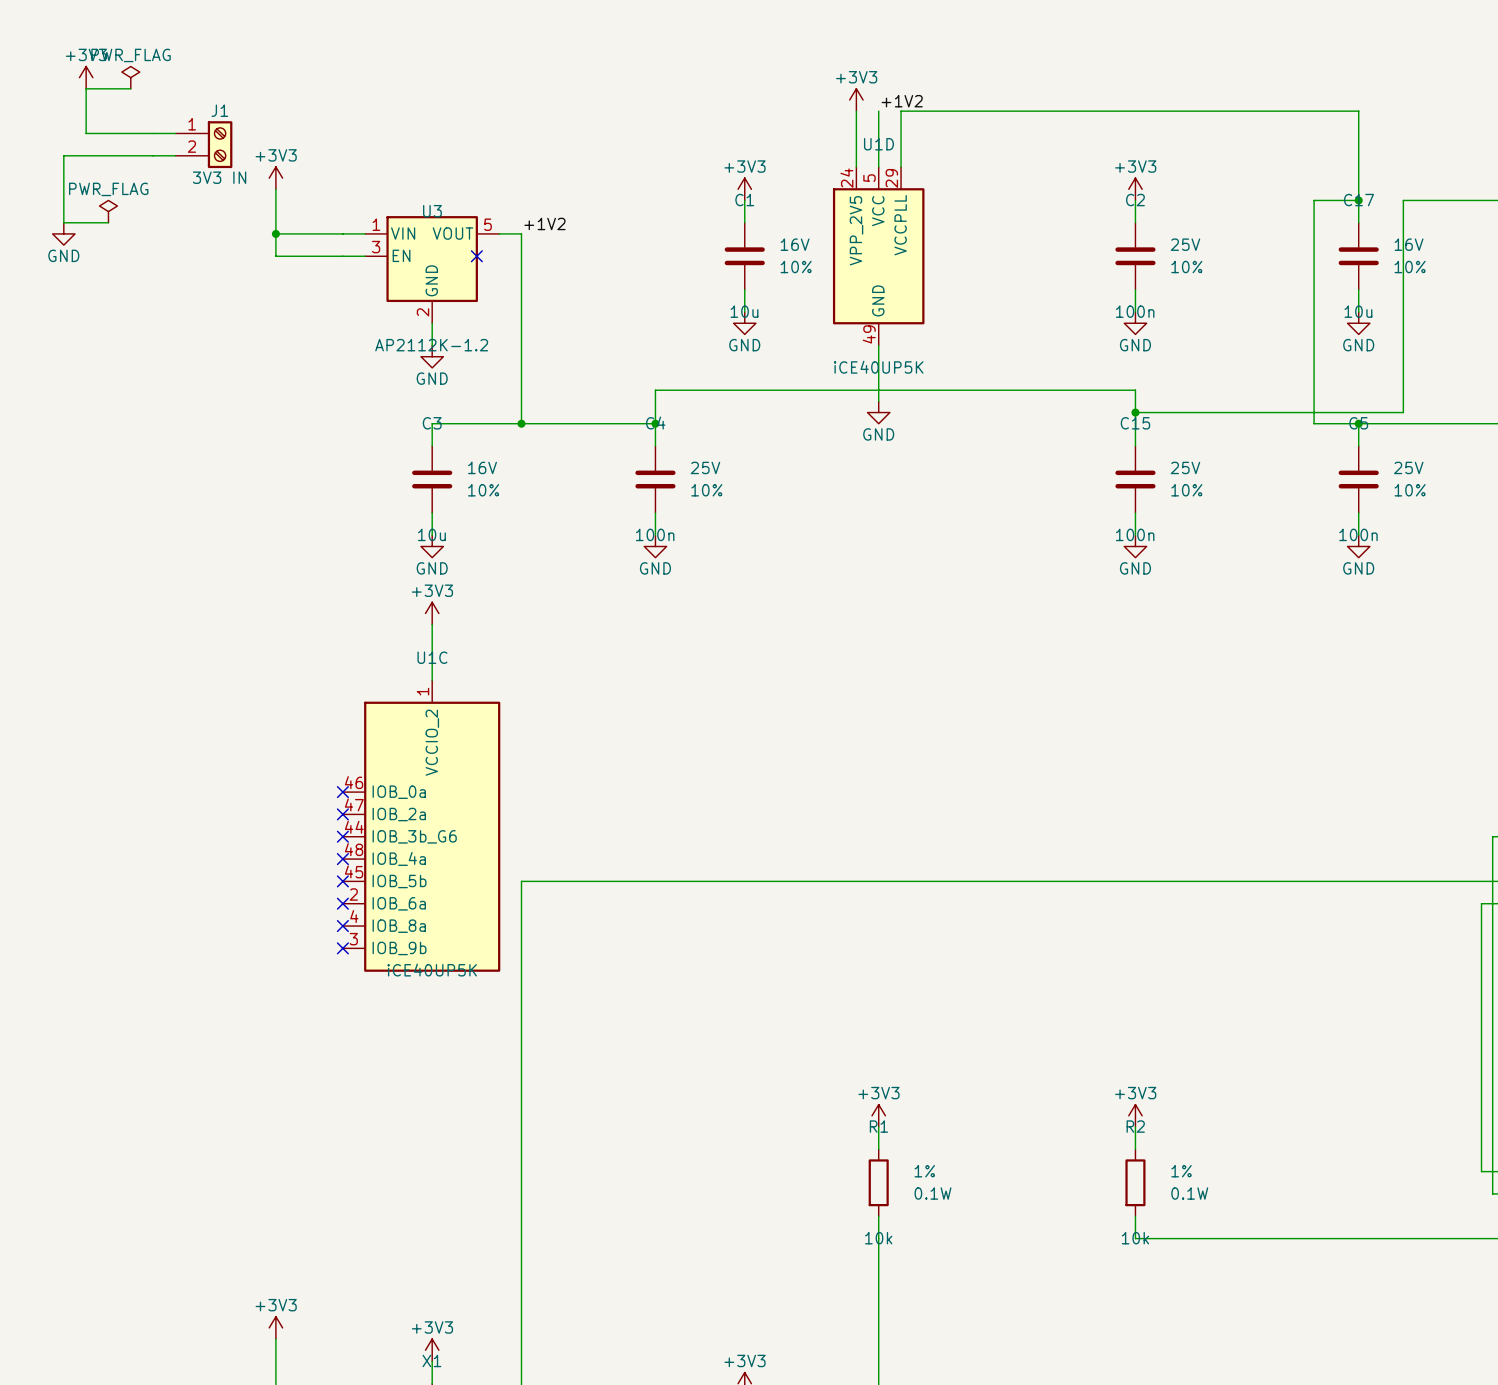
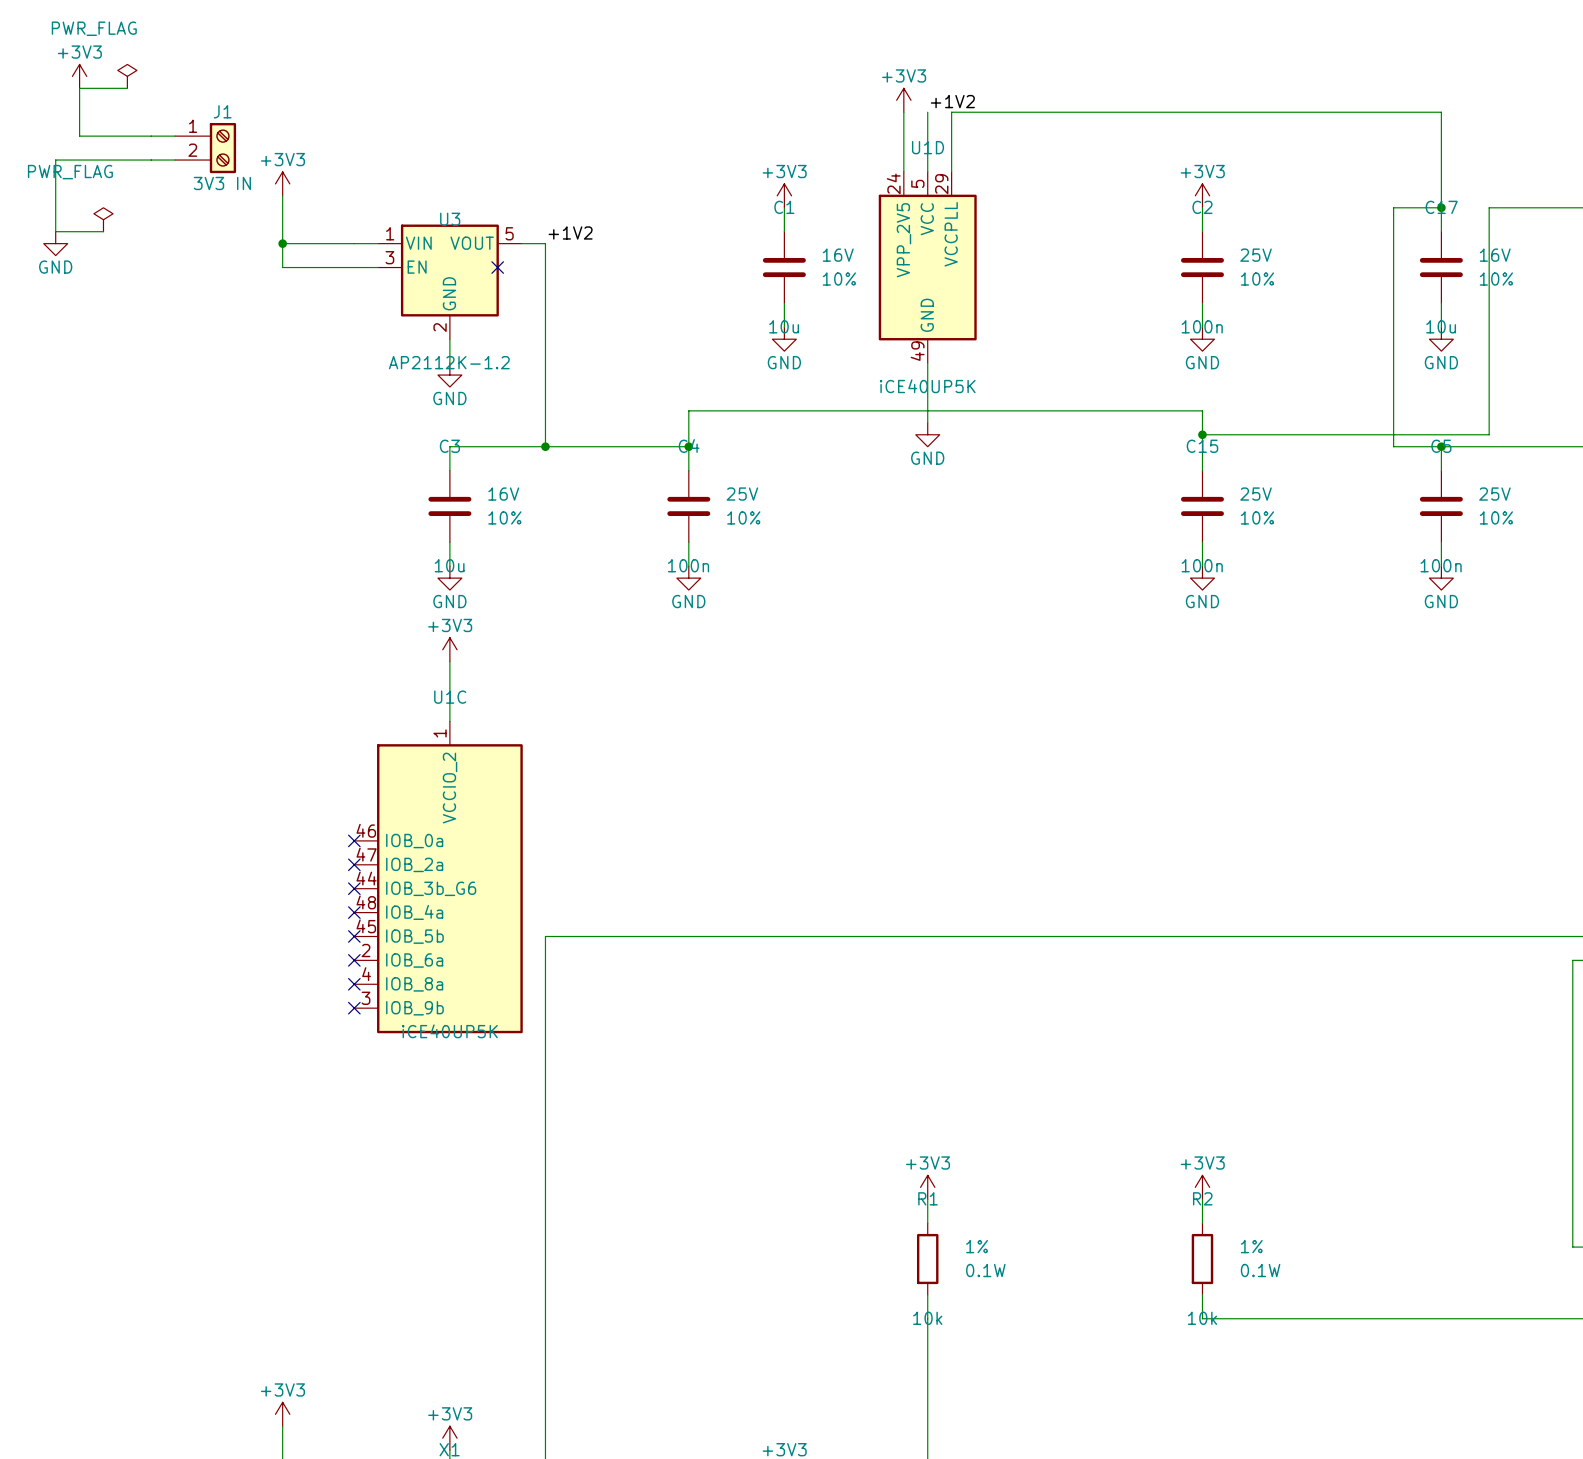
power symbol text position: PWR_FLAG (131, 55) -> PWR_FLAG (94, 28)
power symbol text position: PWR_FLAG (108, 189) -> PWR_FLAG (70, 172)

